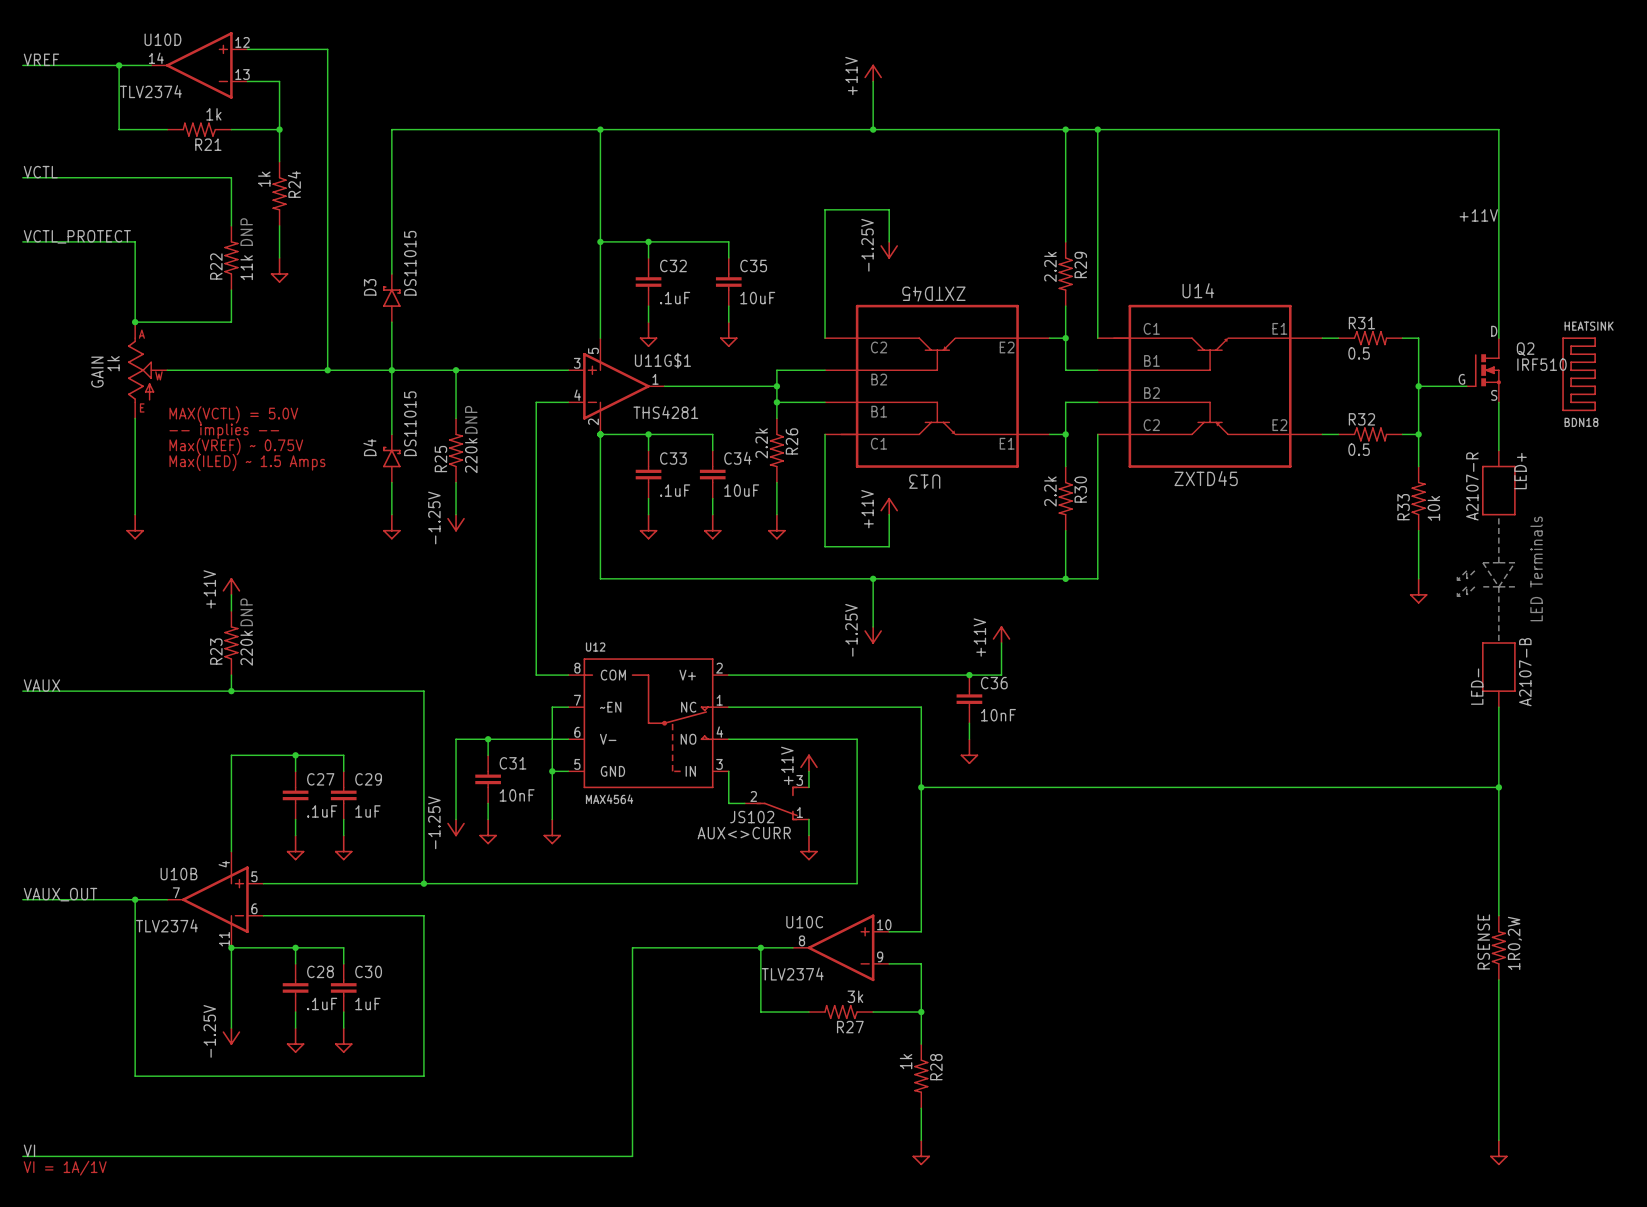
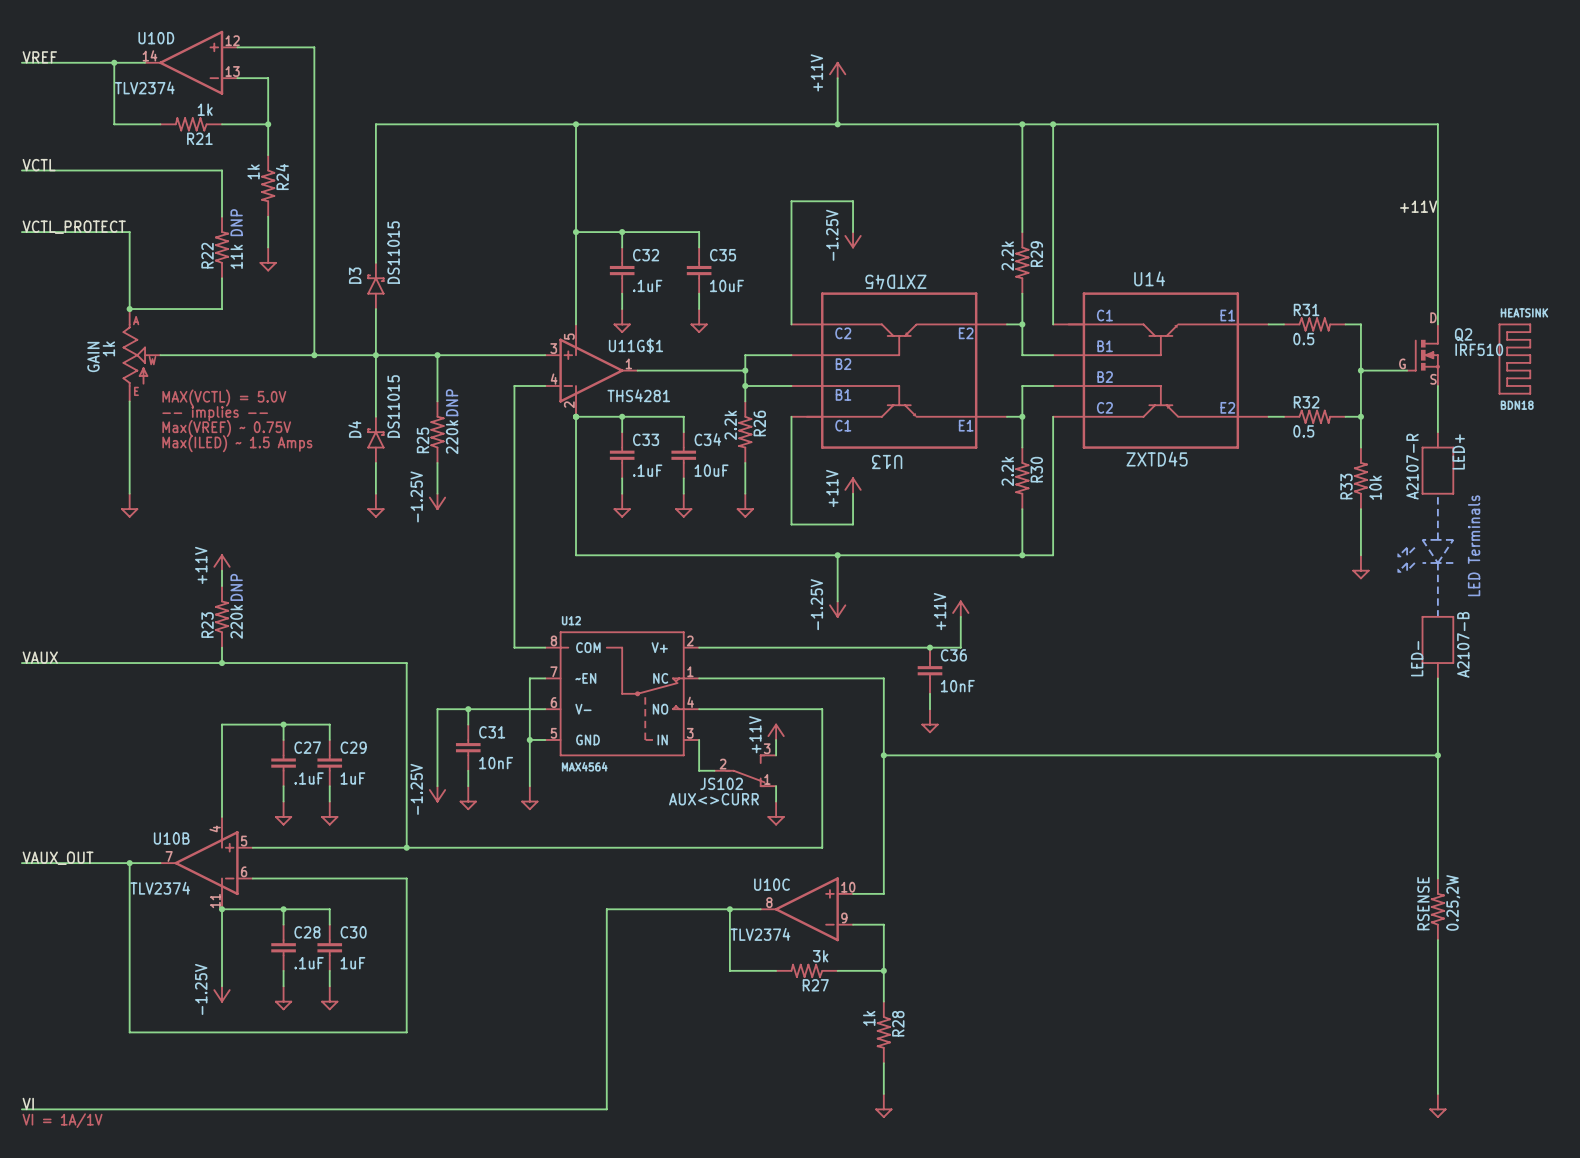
RSENSE value: 1R0,2W (1514, 943) -> 0.25,2W (1453, 902)

